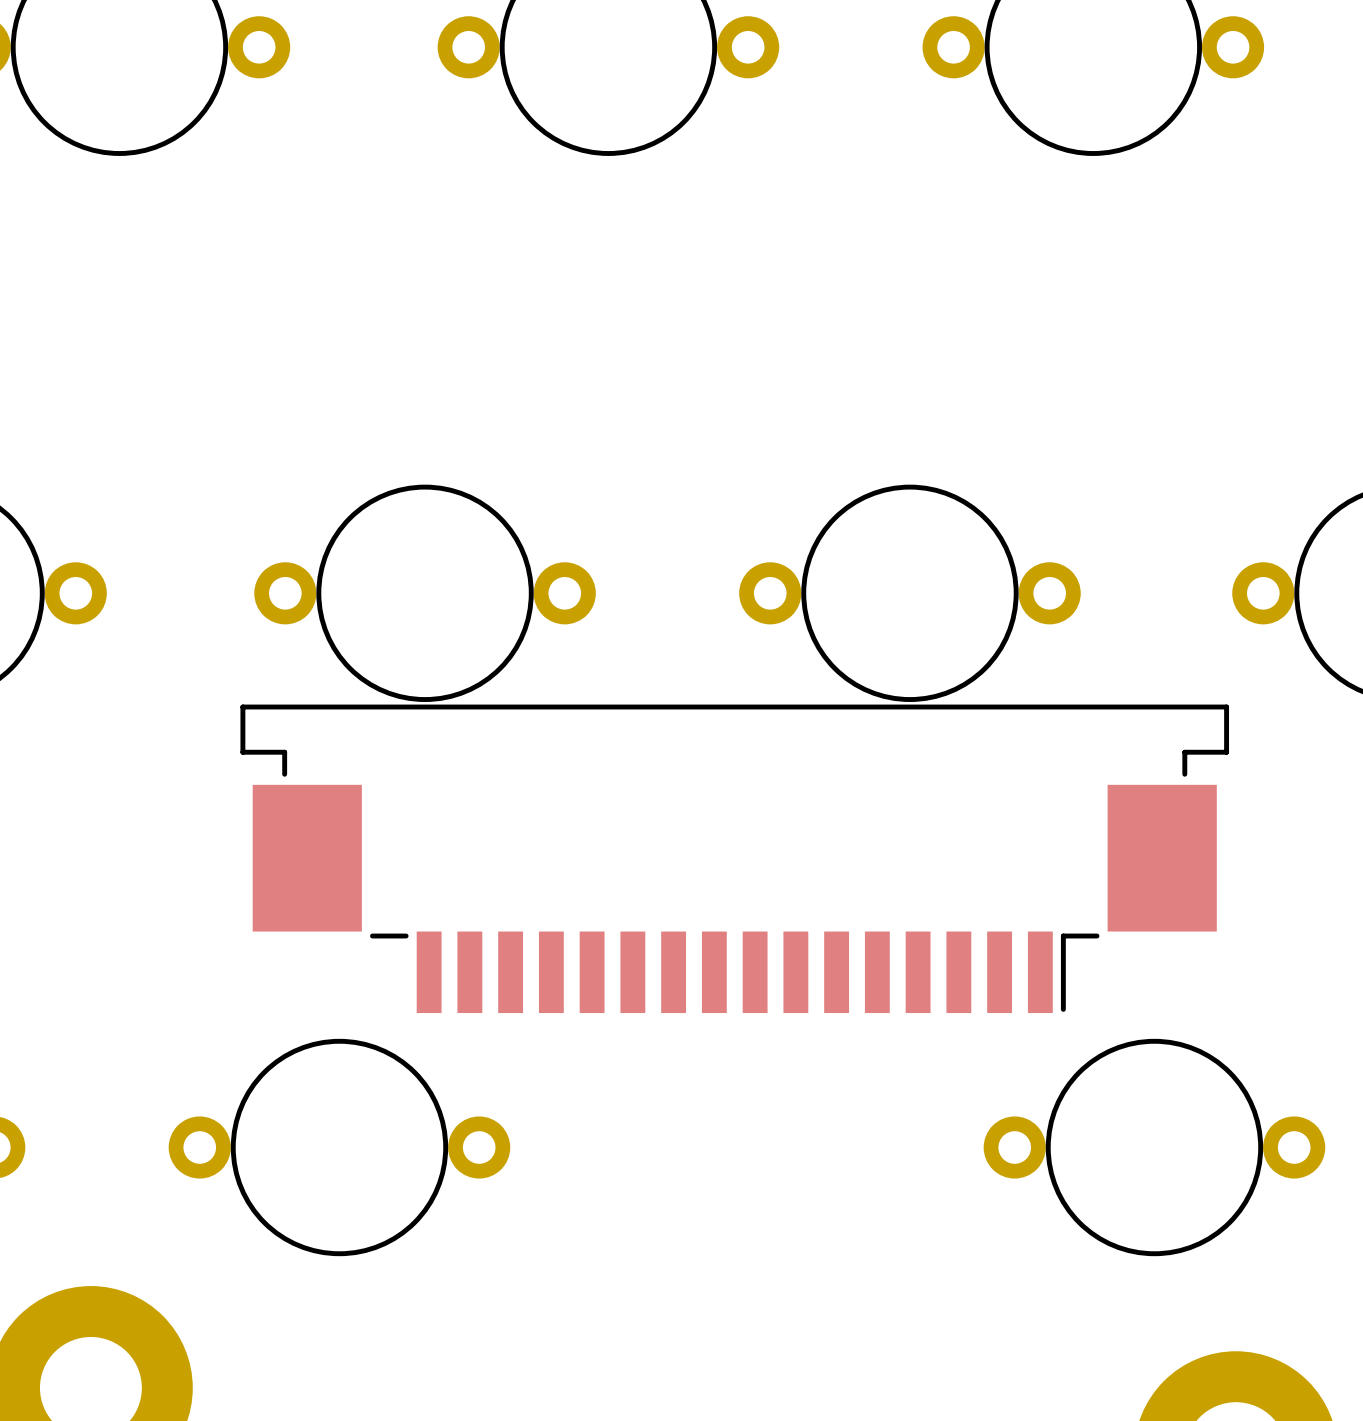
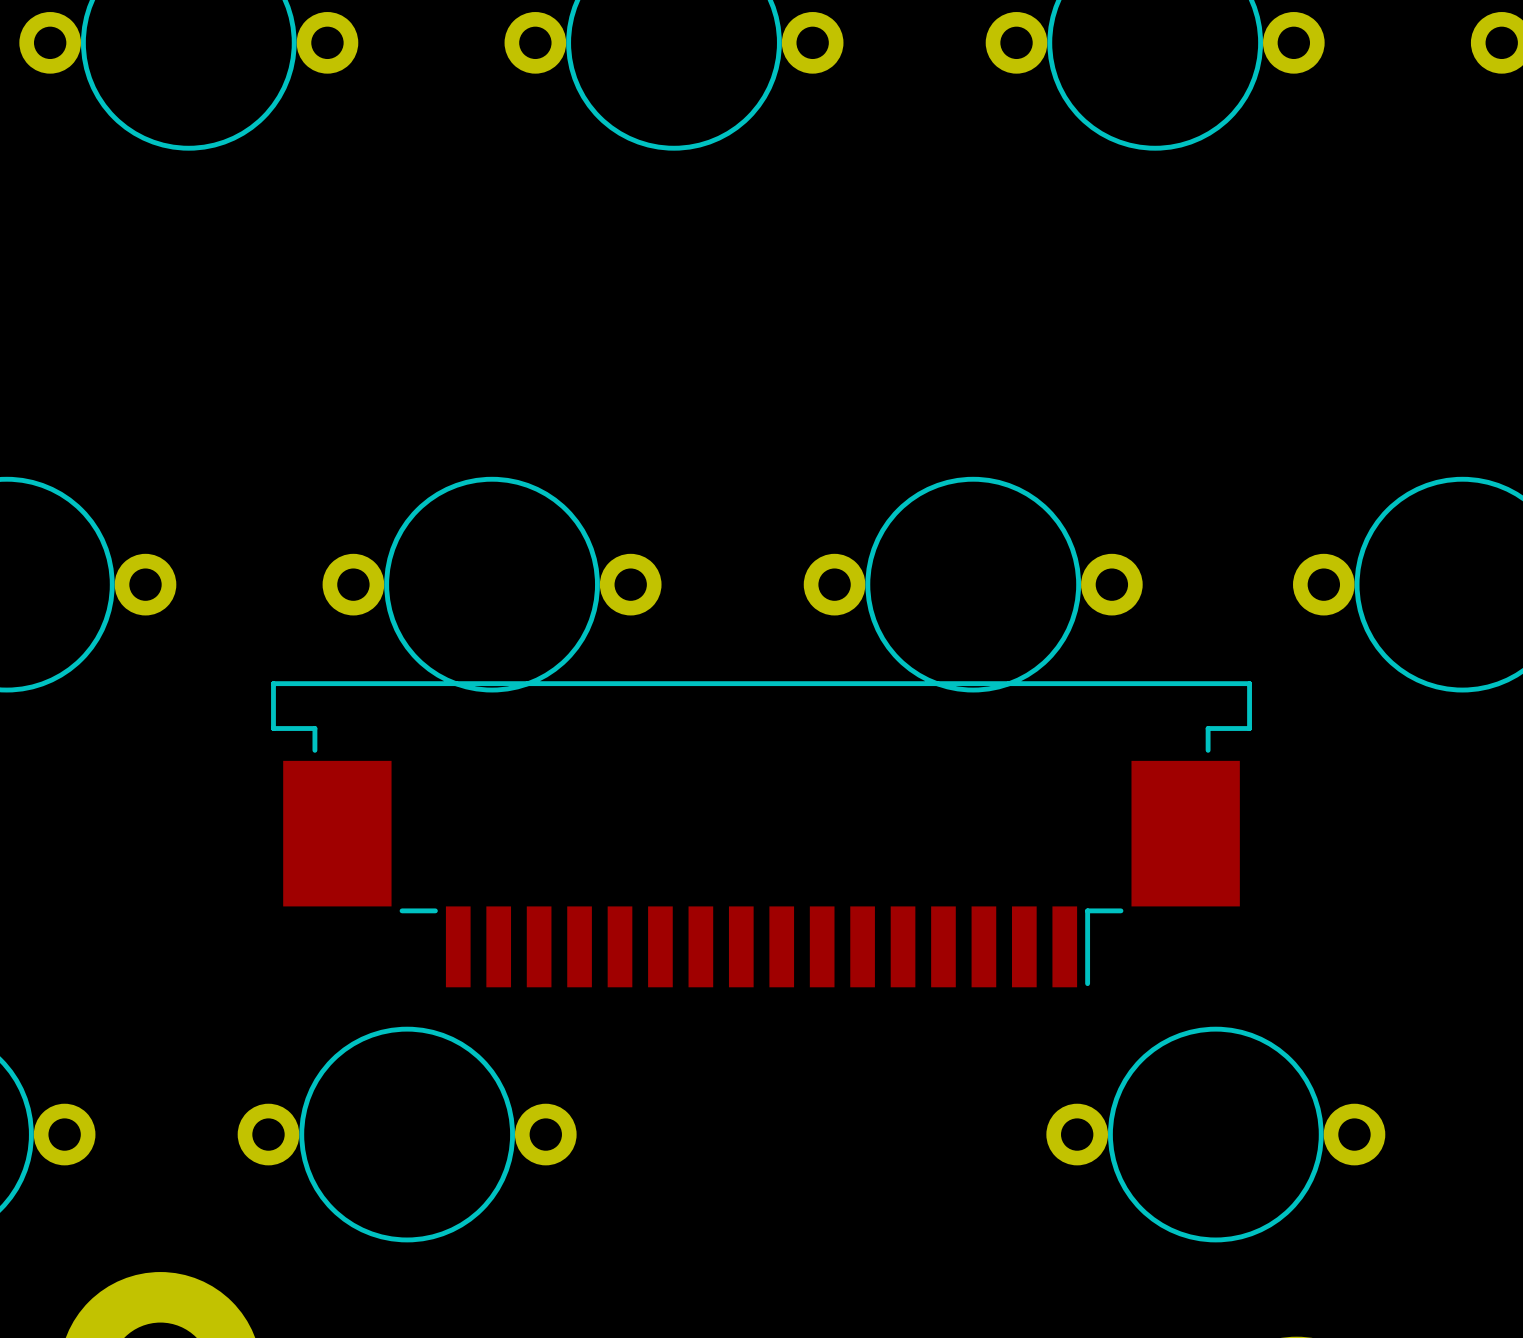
part position: (734, 858) -> (761, 834)

